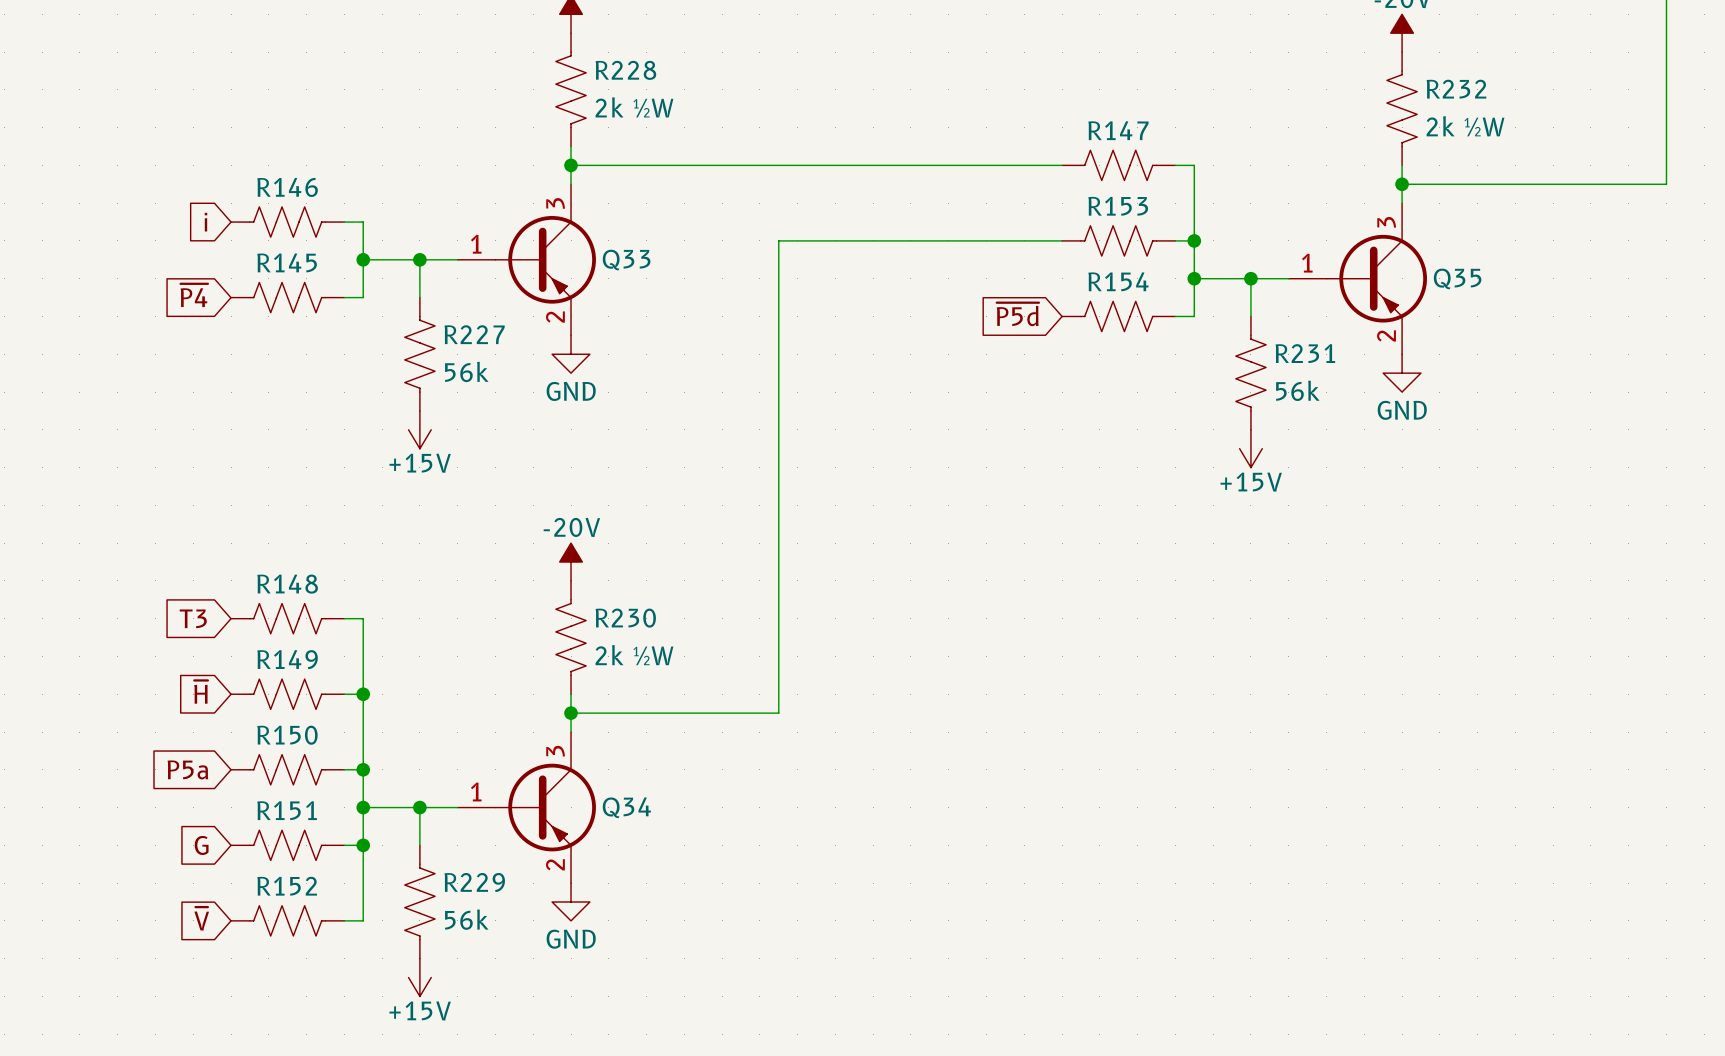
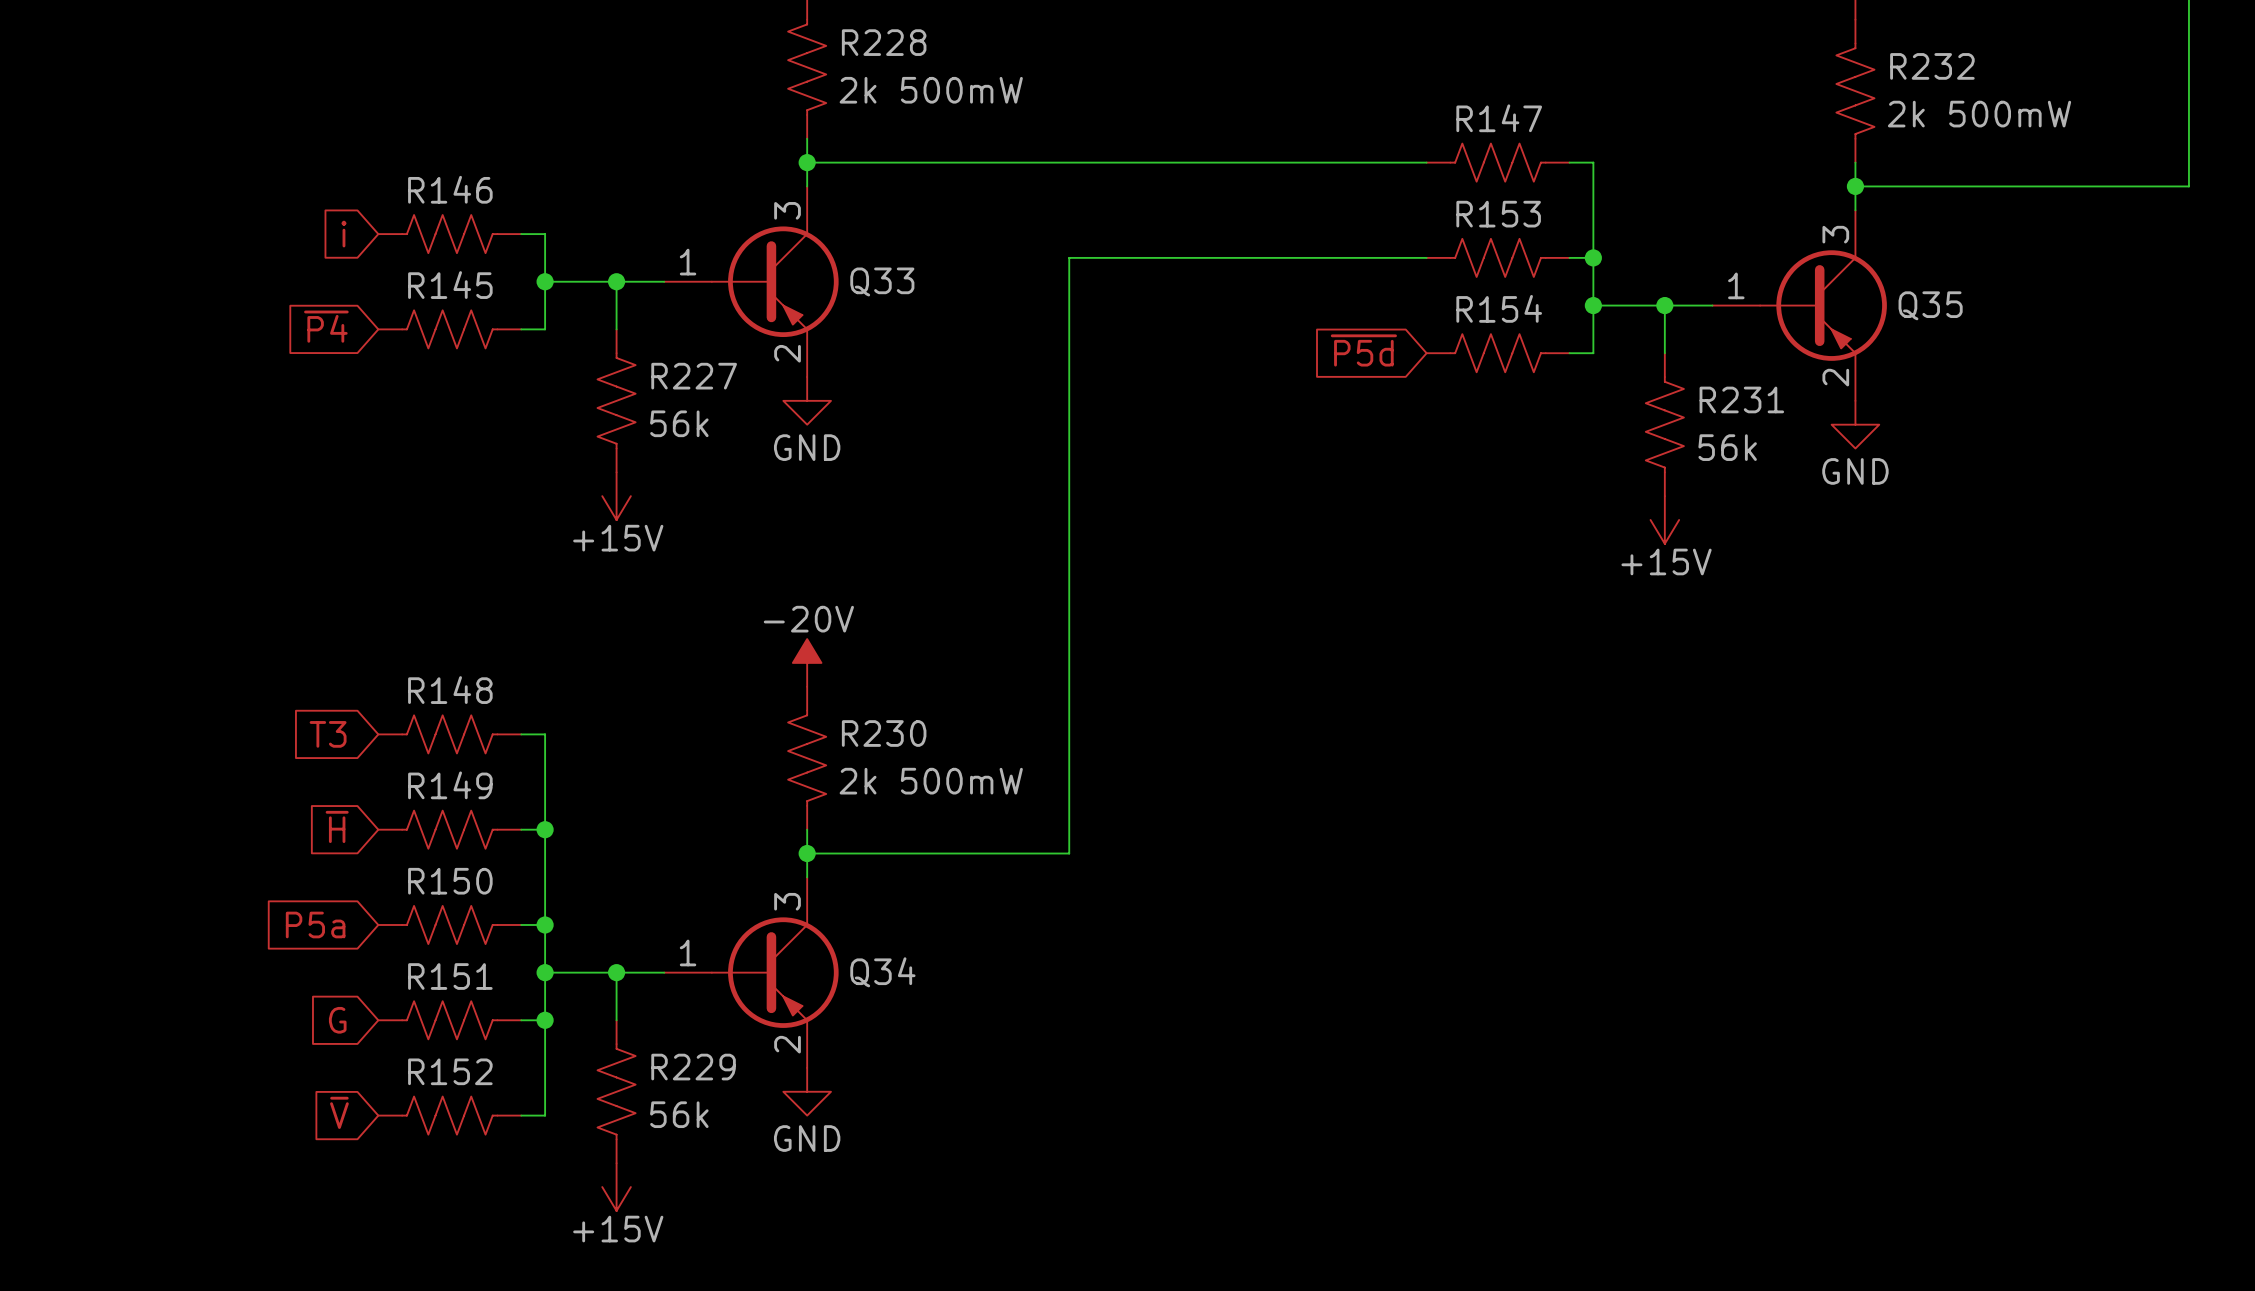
R228 value: 2k ½W (634, 107) -> 2k 500mW (931, 90)
R232 value: 2k ½W (1465, 126) -> 2k 500mW (1979, 114)
R230 value: 2k ½W (634, 655) -> 2k 500mW (931, 781)

